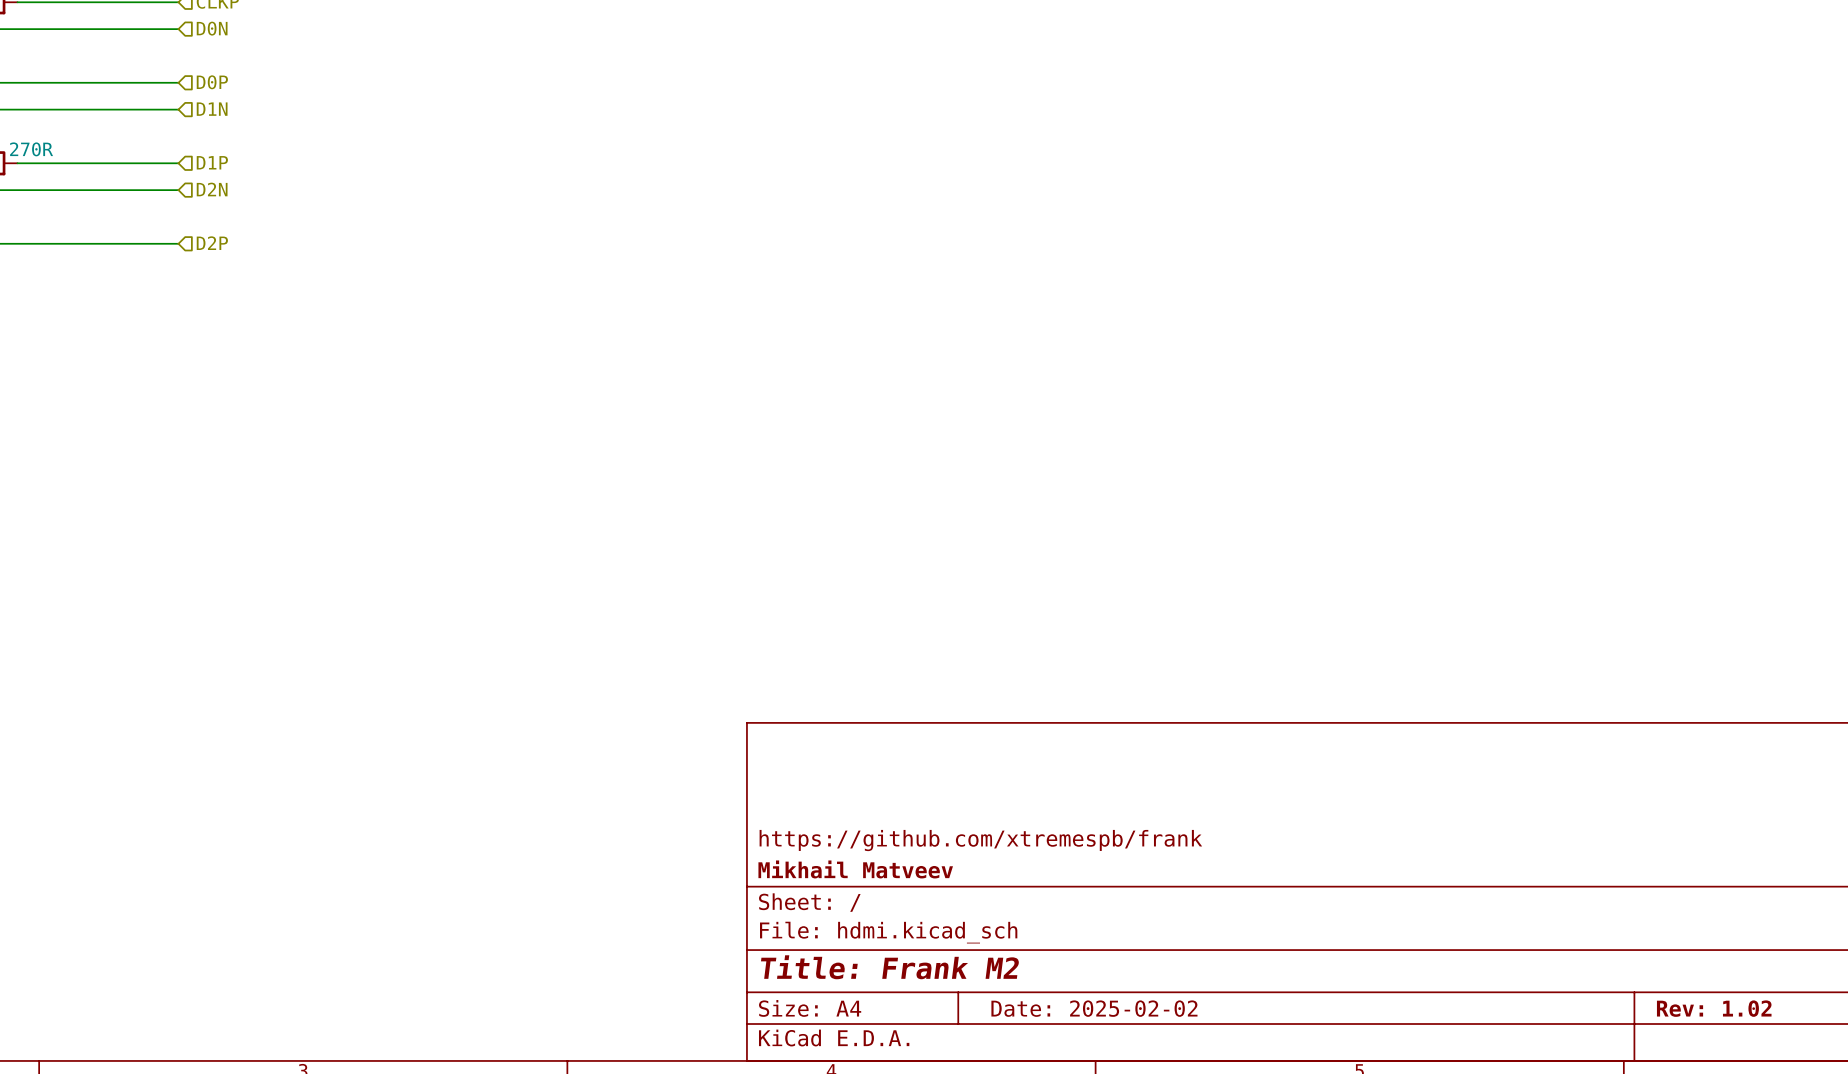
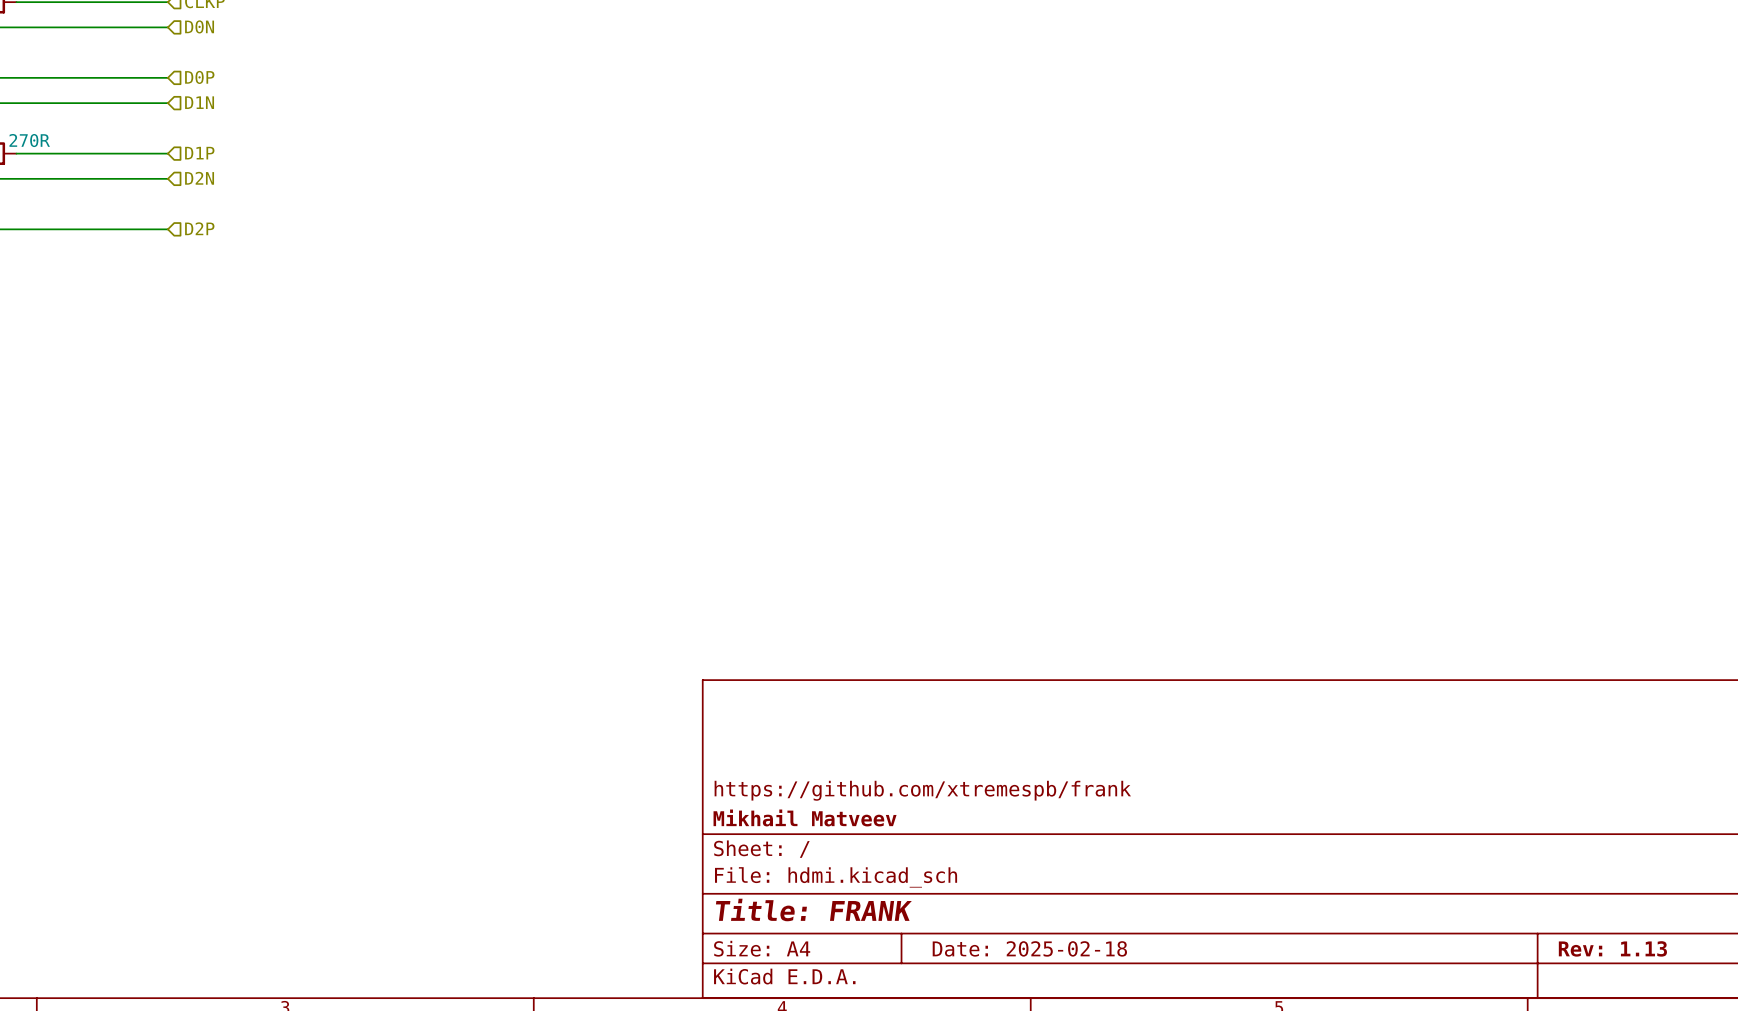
title block: Title: Frank M2 (890, 967) -> Title: FRANK (813, 909)
title block: Date: 2025-02-02 (1094, 1008) -> Date: 2025-02-18 (1029, 948)
title block: Rev: 1.02 (1714, 1008) -> Rev: 1.13 (1612, 948)

